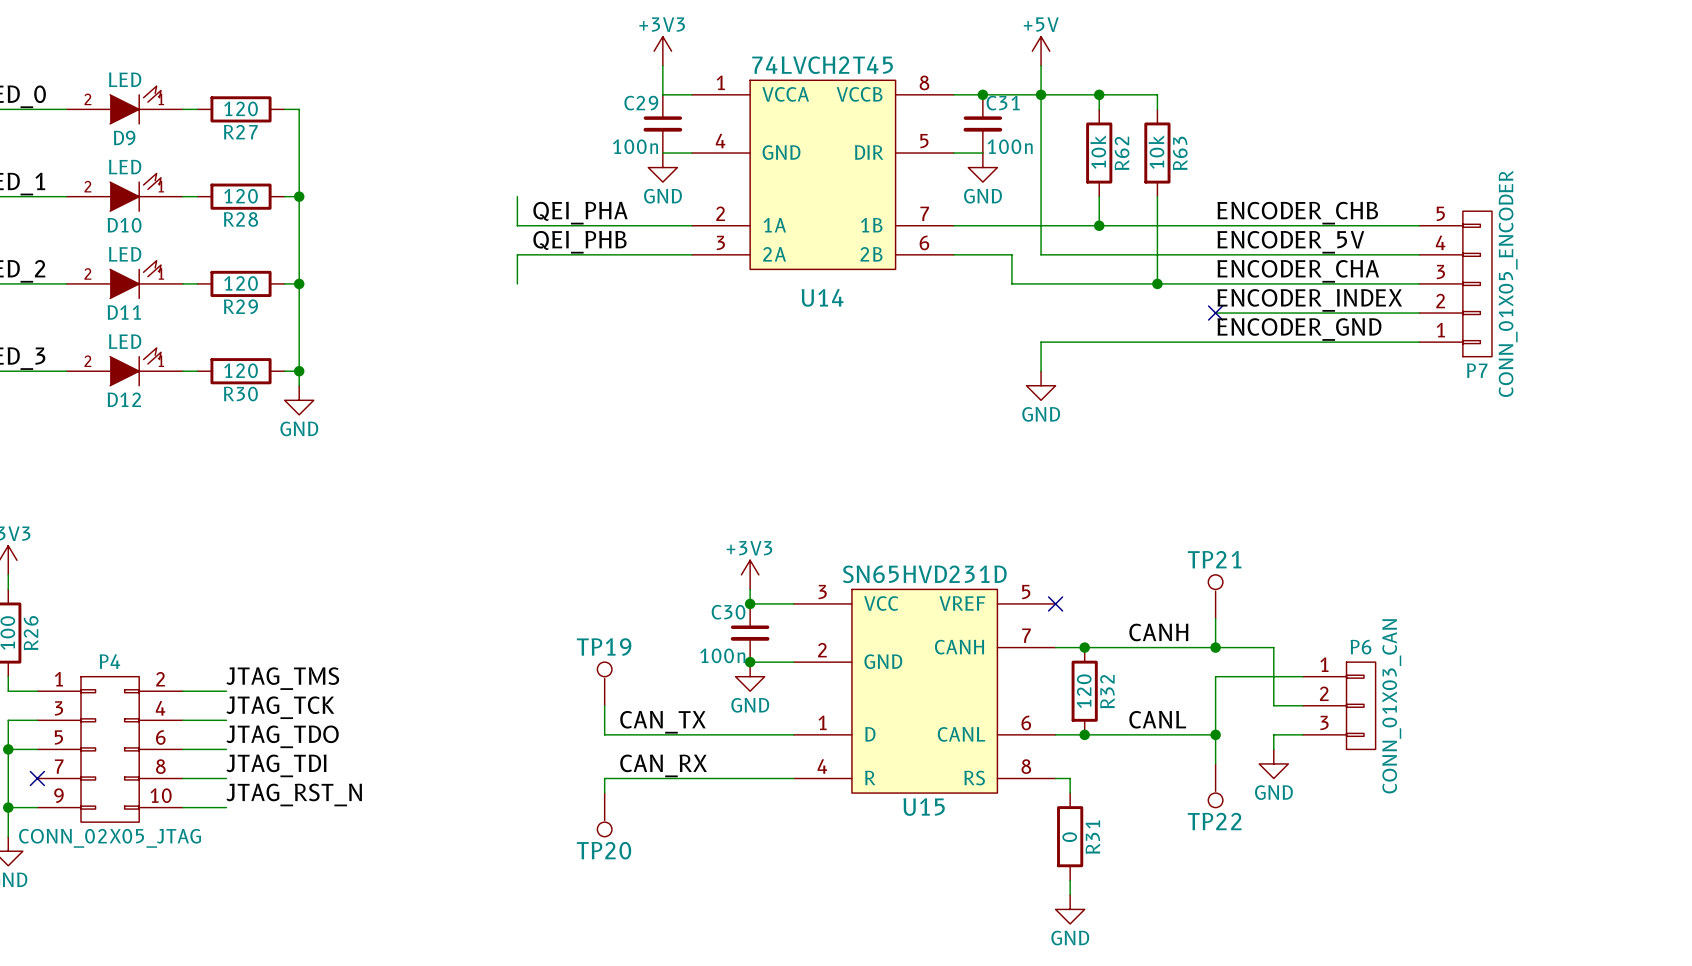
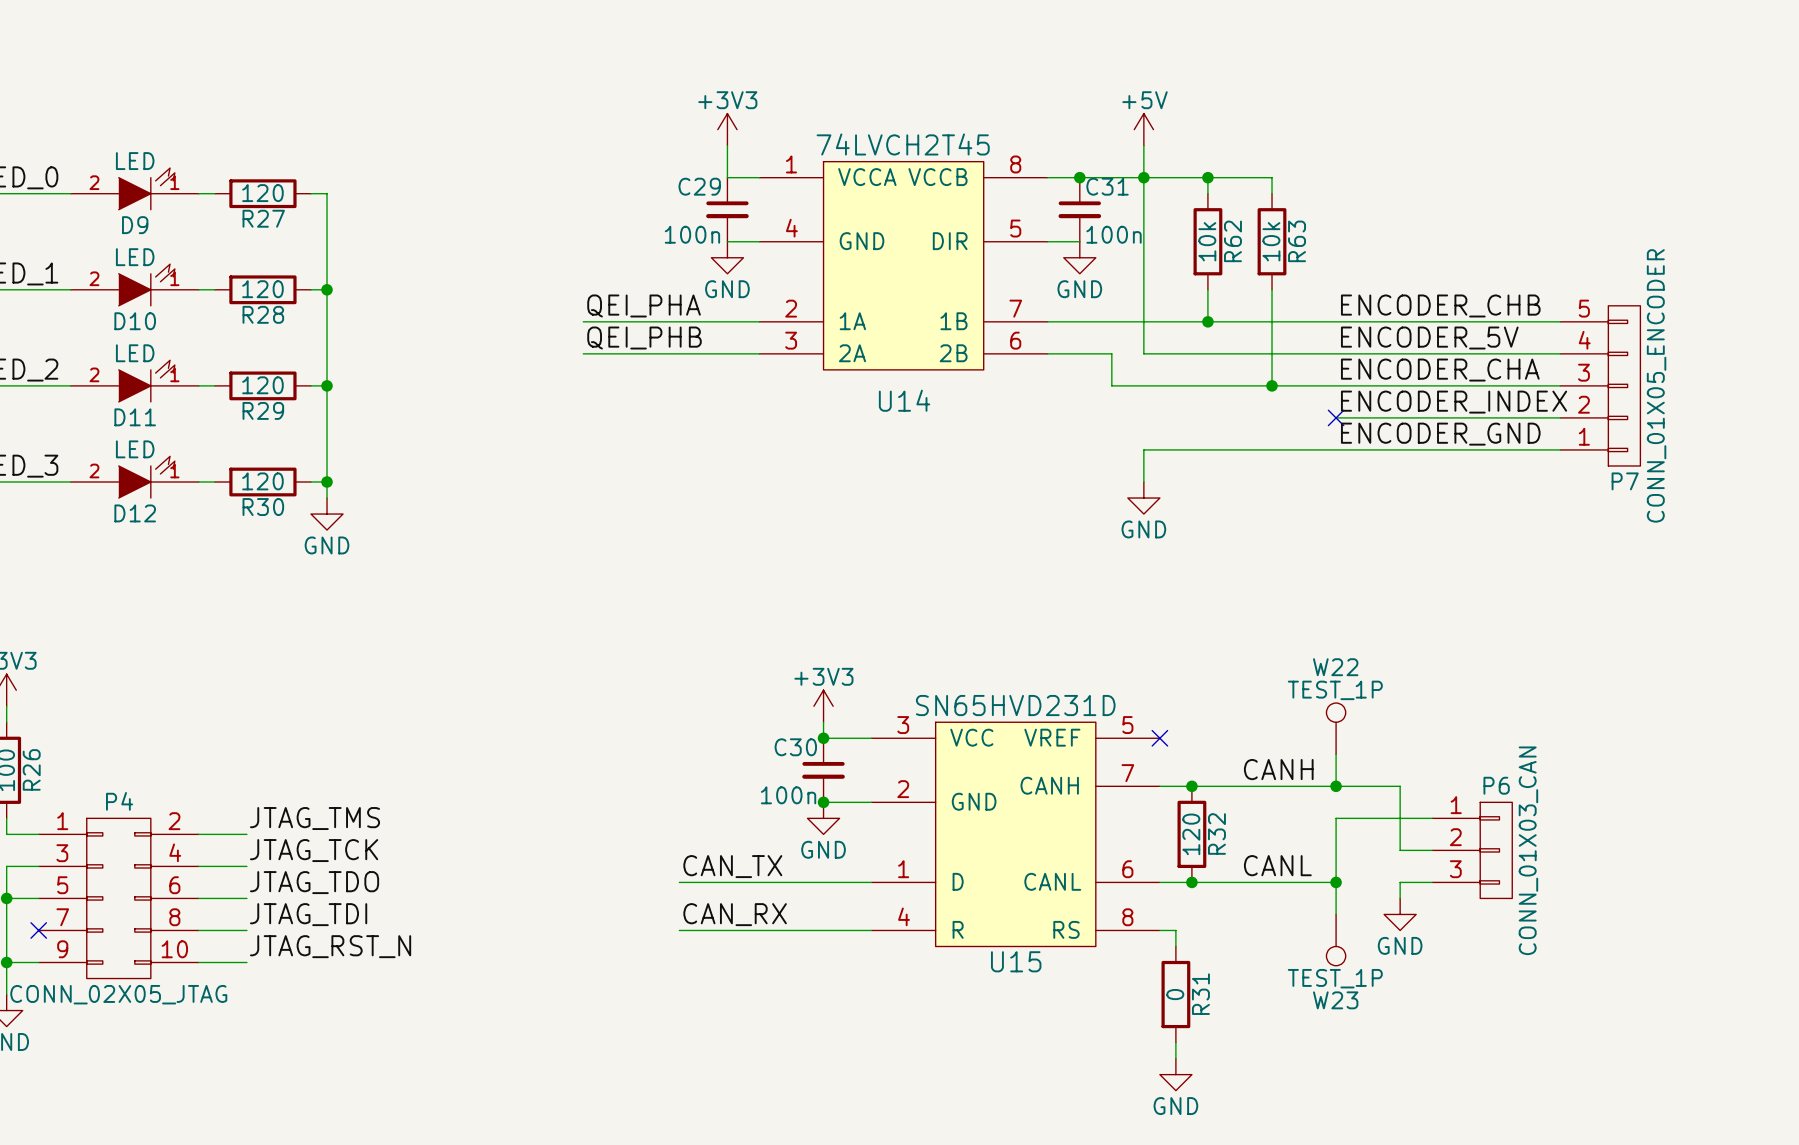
wire: (517, 196) (517, 225) (531, 225) -> none
wire: (531, 254) (517, 254) (517, 283) -> none
W22: none -> TEST_1P (1336, 728)
TP21: (1215, 596) -> none
TP19: (604, 683) -> none
wire: (604, 705) (604, 734) (619, 734) -> none
wire: (619, 778) (604, 778) (604, 793) -> none
TP22: (1215, 785) -> none
W23: none -> TEST_1P (1336, 940)
TP20: (604, 814) -> none

